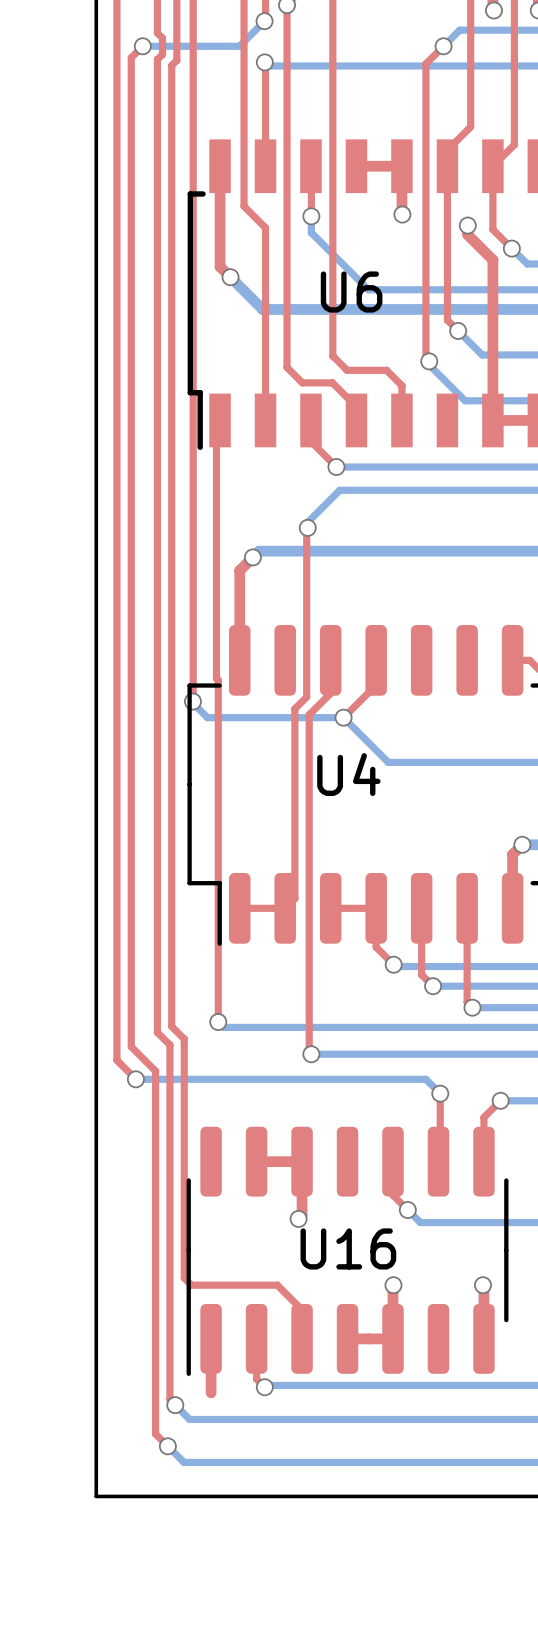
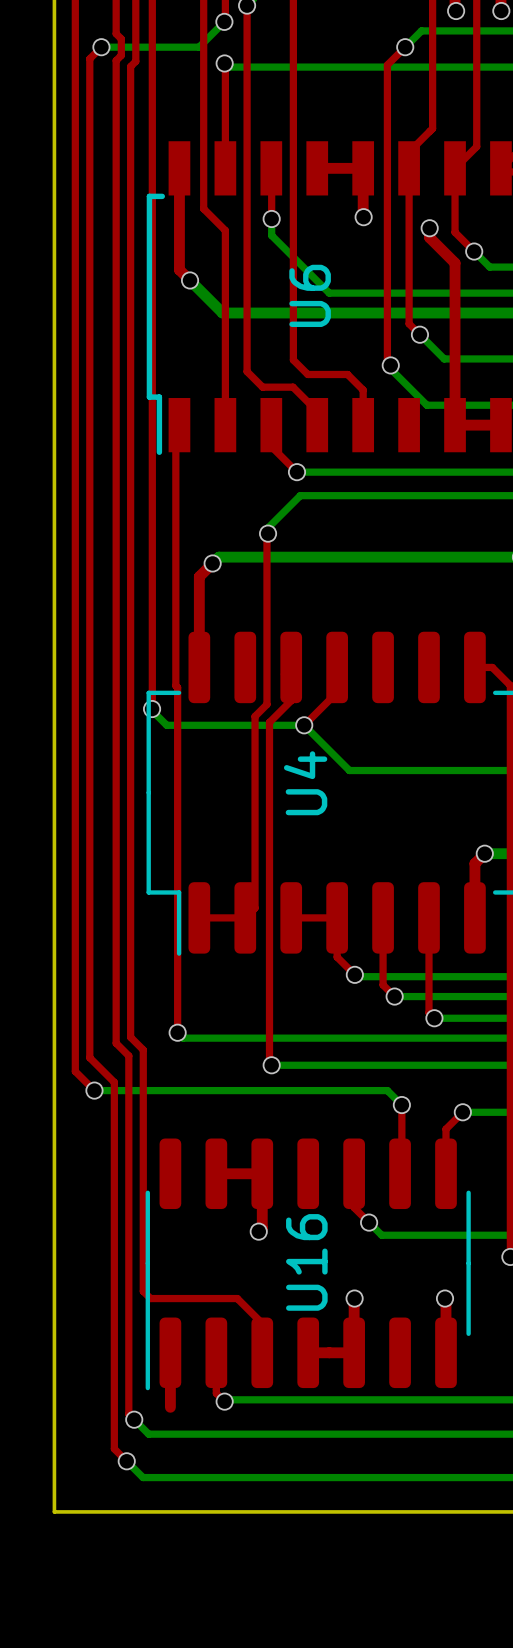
U6 name rotation: 0° (351, 292) -> 90° counterclockwise (310, 295)
U4 name rotation: 0° (348, 774) -> 90° counterclockwise (305, 783)
U16 name rotation: 0° (348, 1248) -> 90° counterclockwise (306, 1262)

